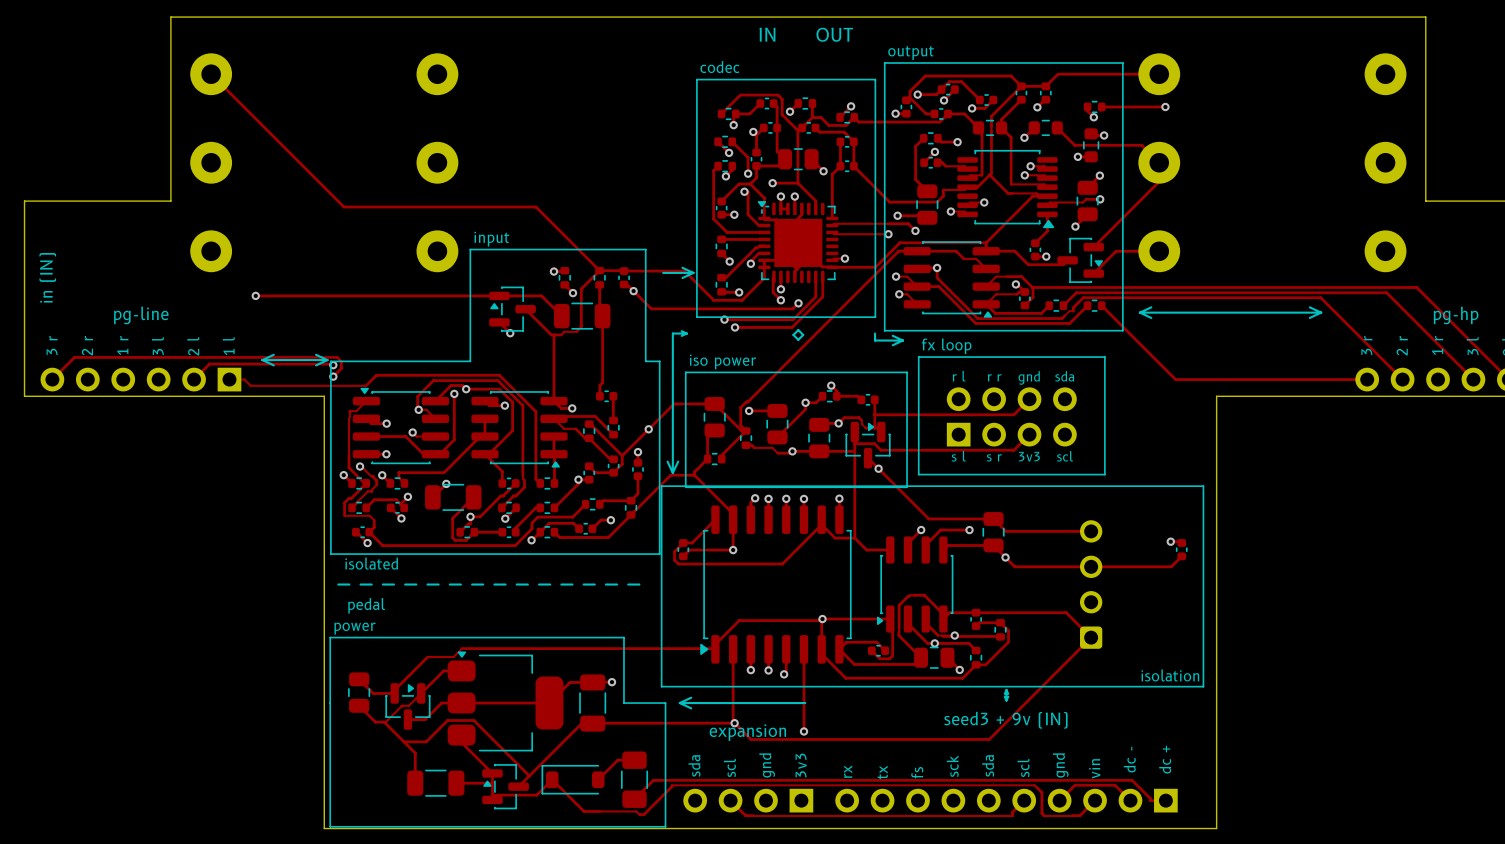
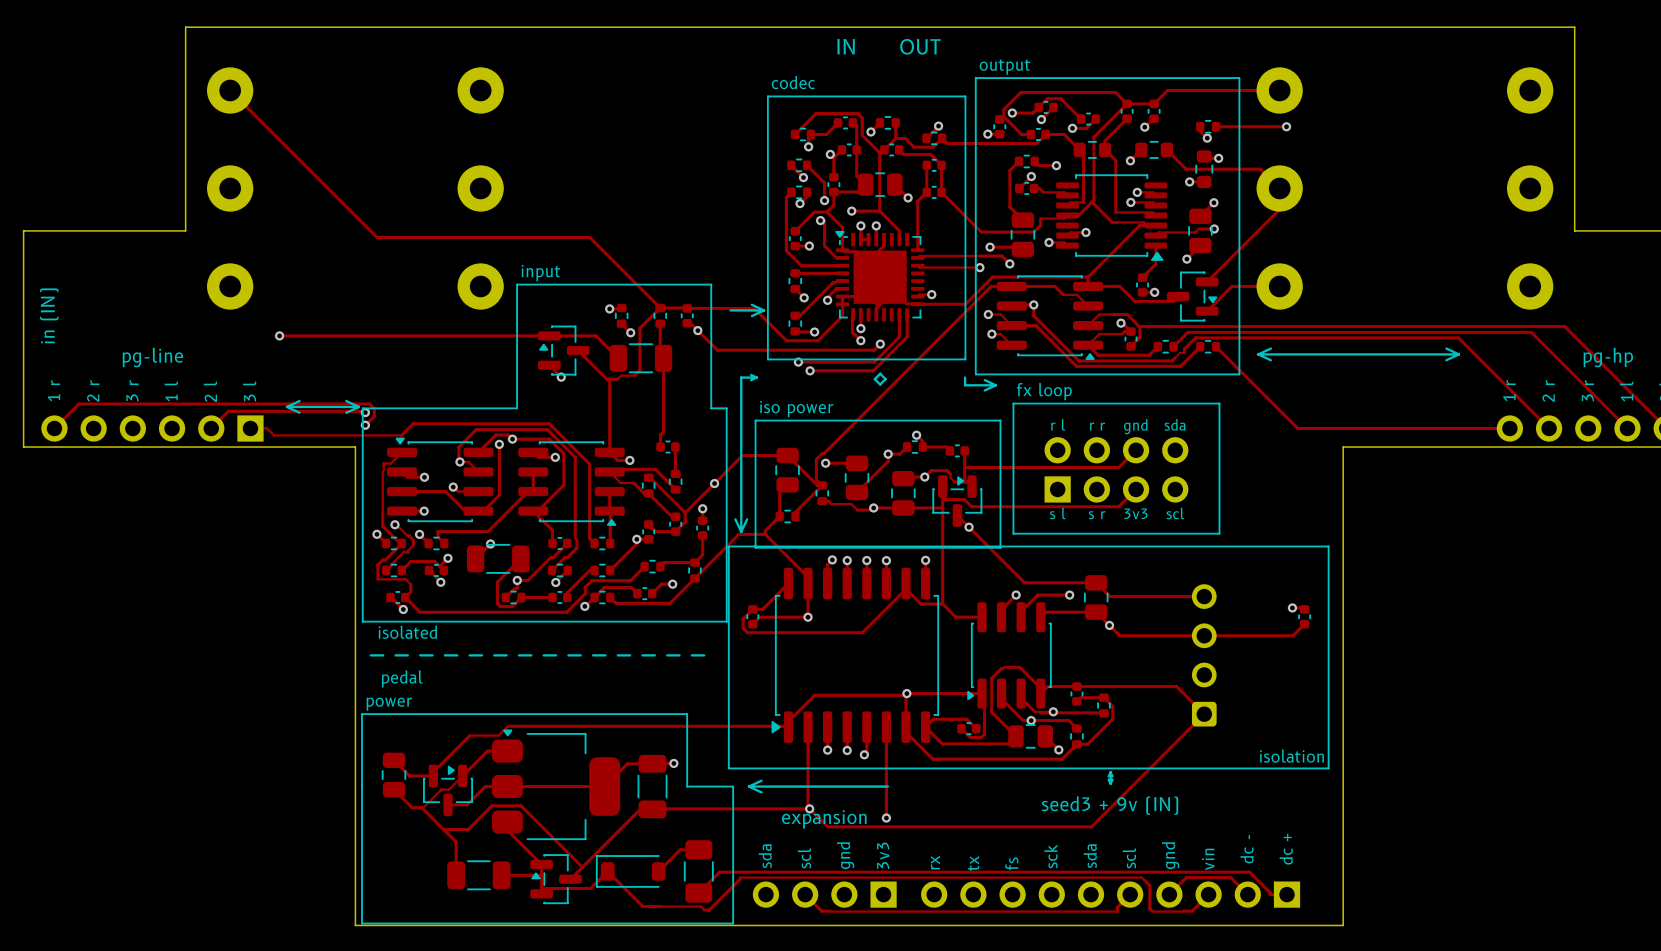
text: 3 r (52, 345) -> 1 r (53, 390)
text: 1 r (122, 345) -> 3 r (132, 390)
text: 3 r (1366, 345) -> 1 r (1509, 390)
text: 1 r (1437, 345) -> 3 r (1587, 390)
text: 3 l (157, 346) -> 1 l (171, 391)
text: 1 l (228, 346) -> 3 l (249, 391)
text: 3 l (1472, 346) -> 1 l (1626, 391)

